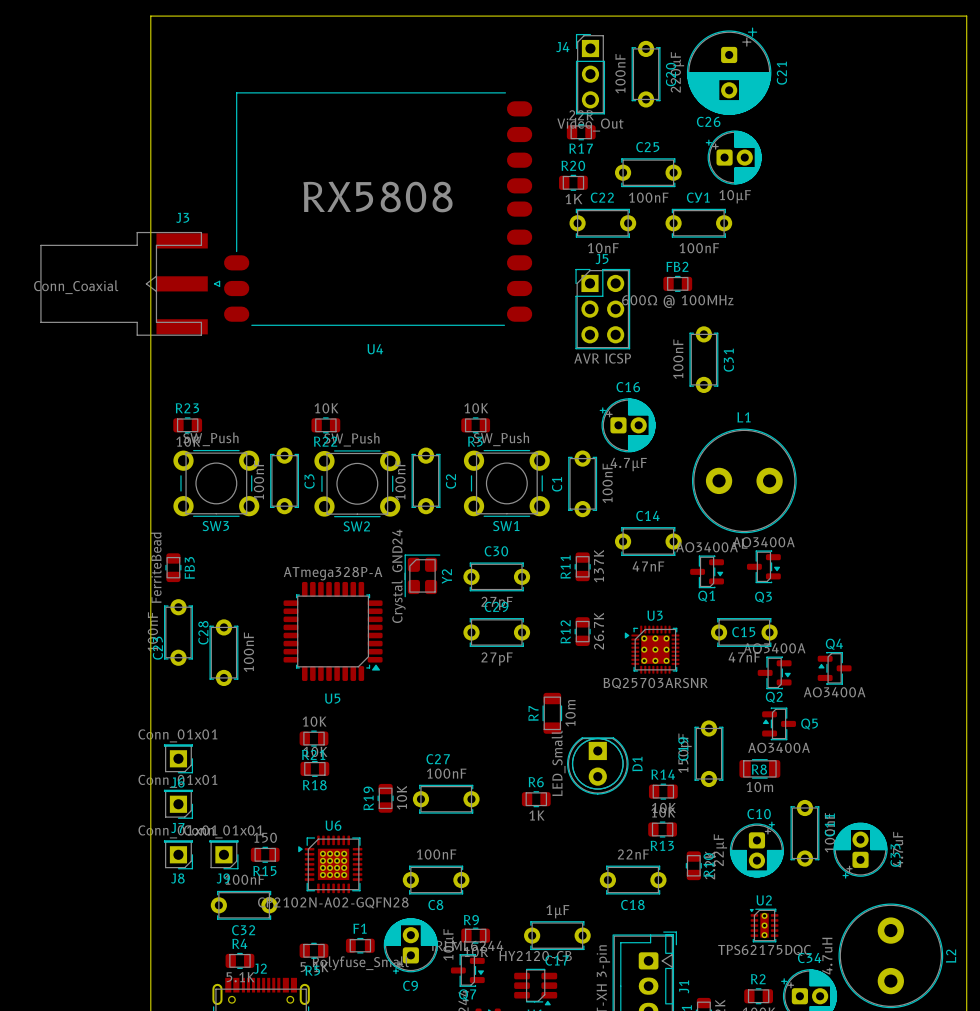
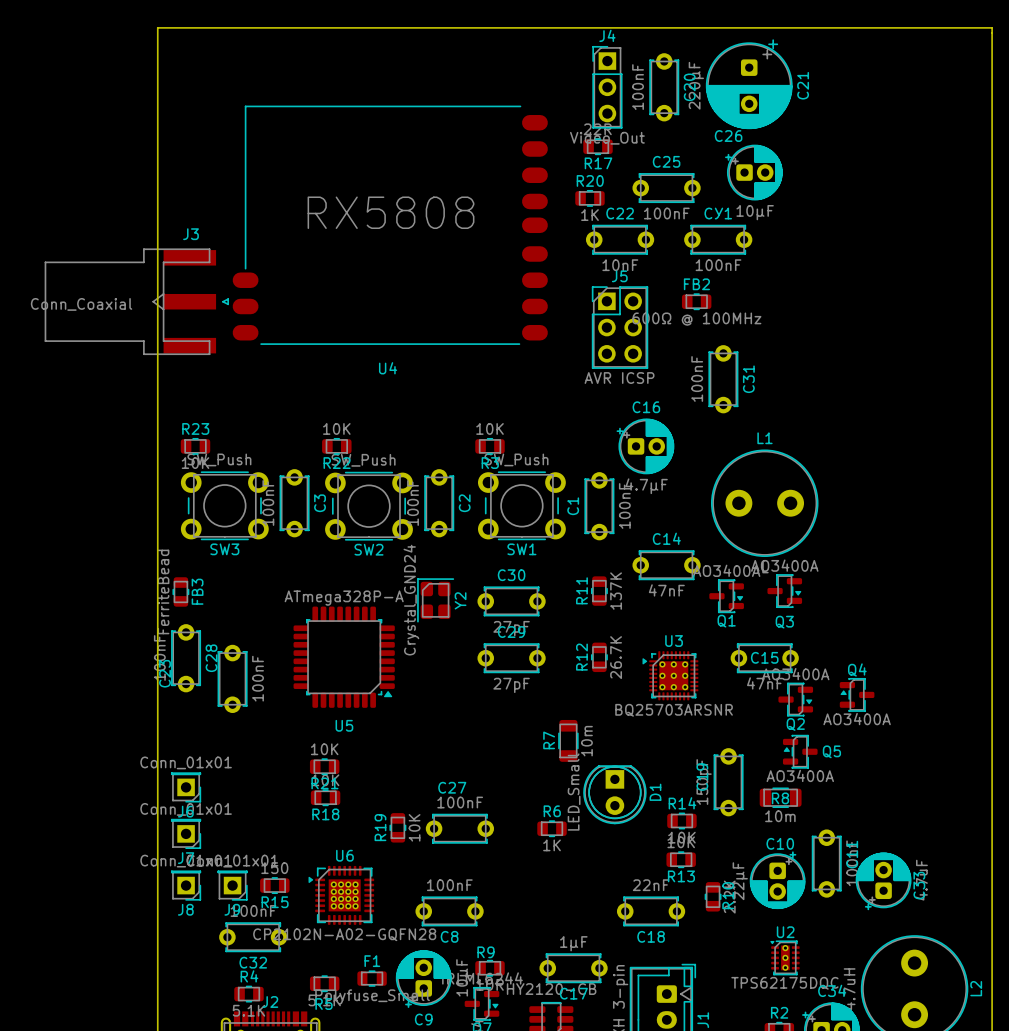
J4 name position: J4 (562, 47) -> J4 (607, 35)

